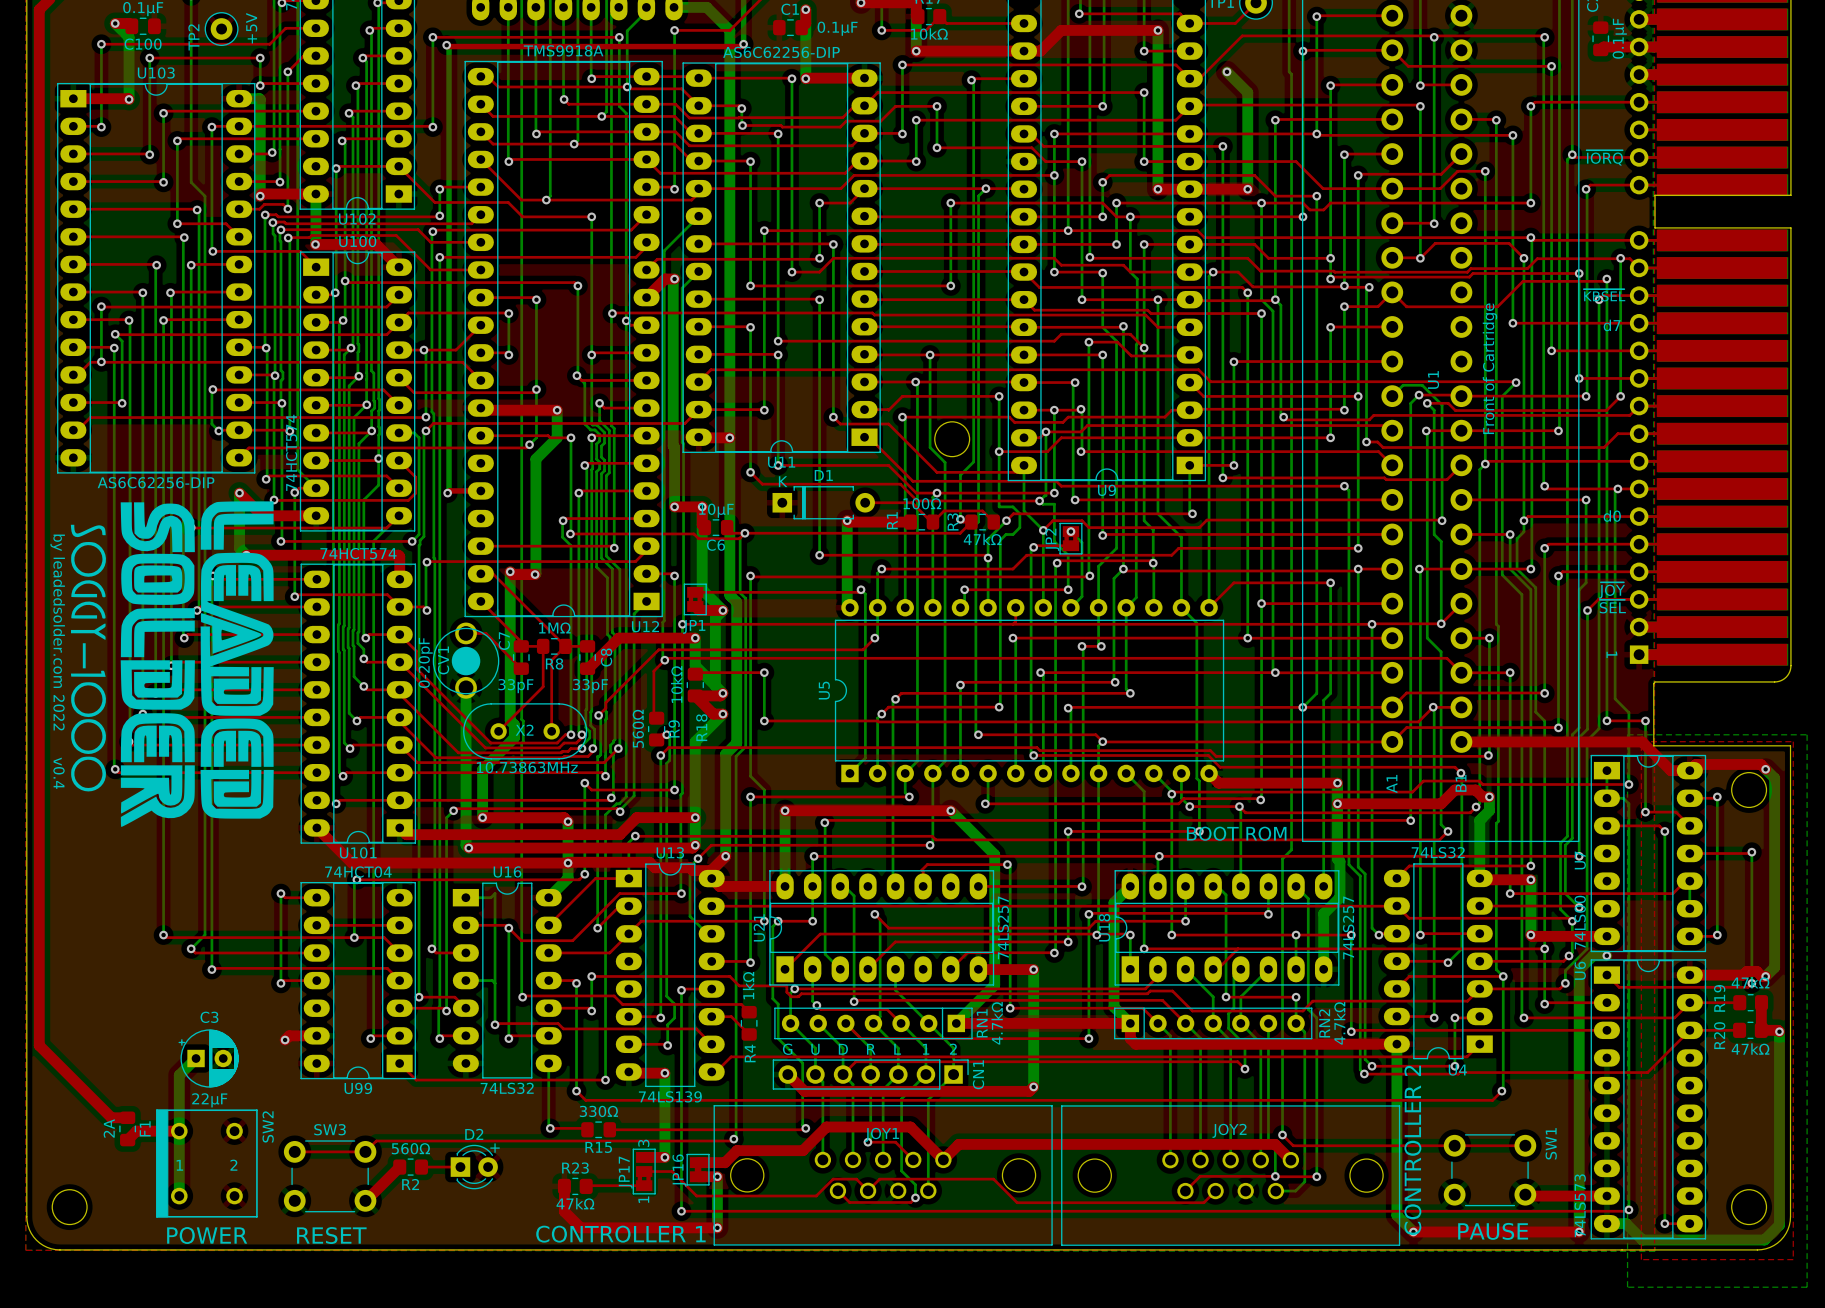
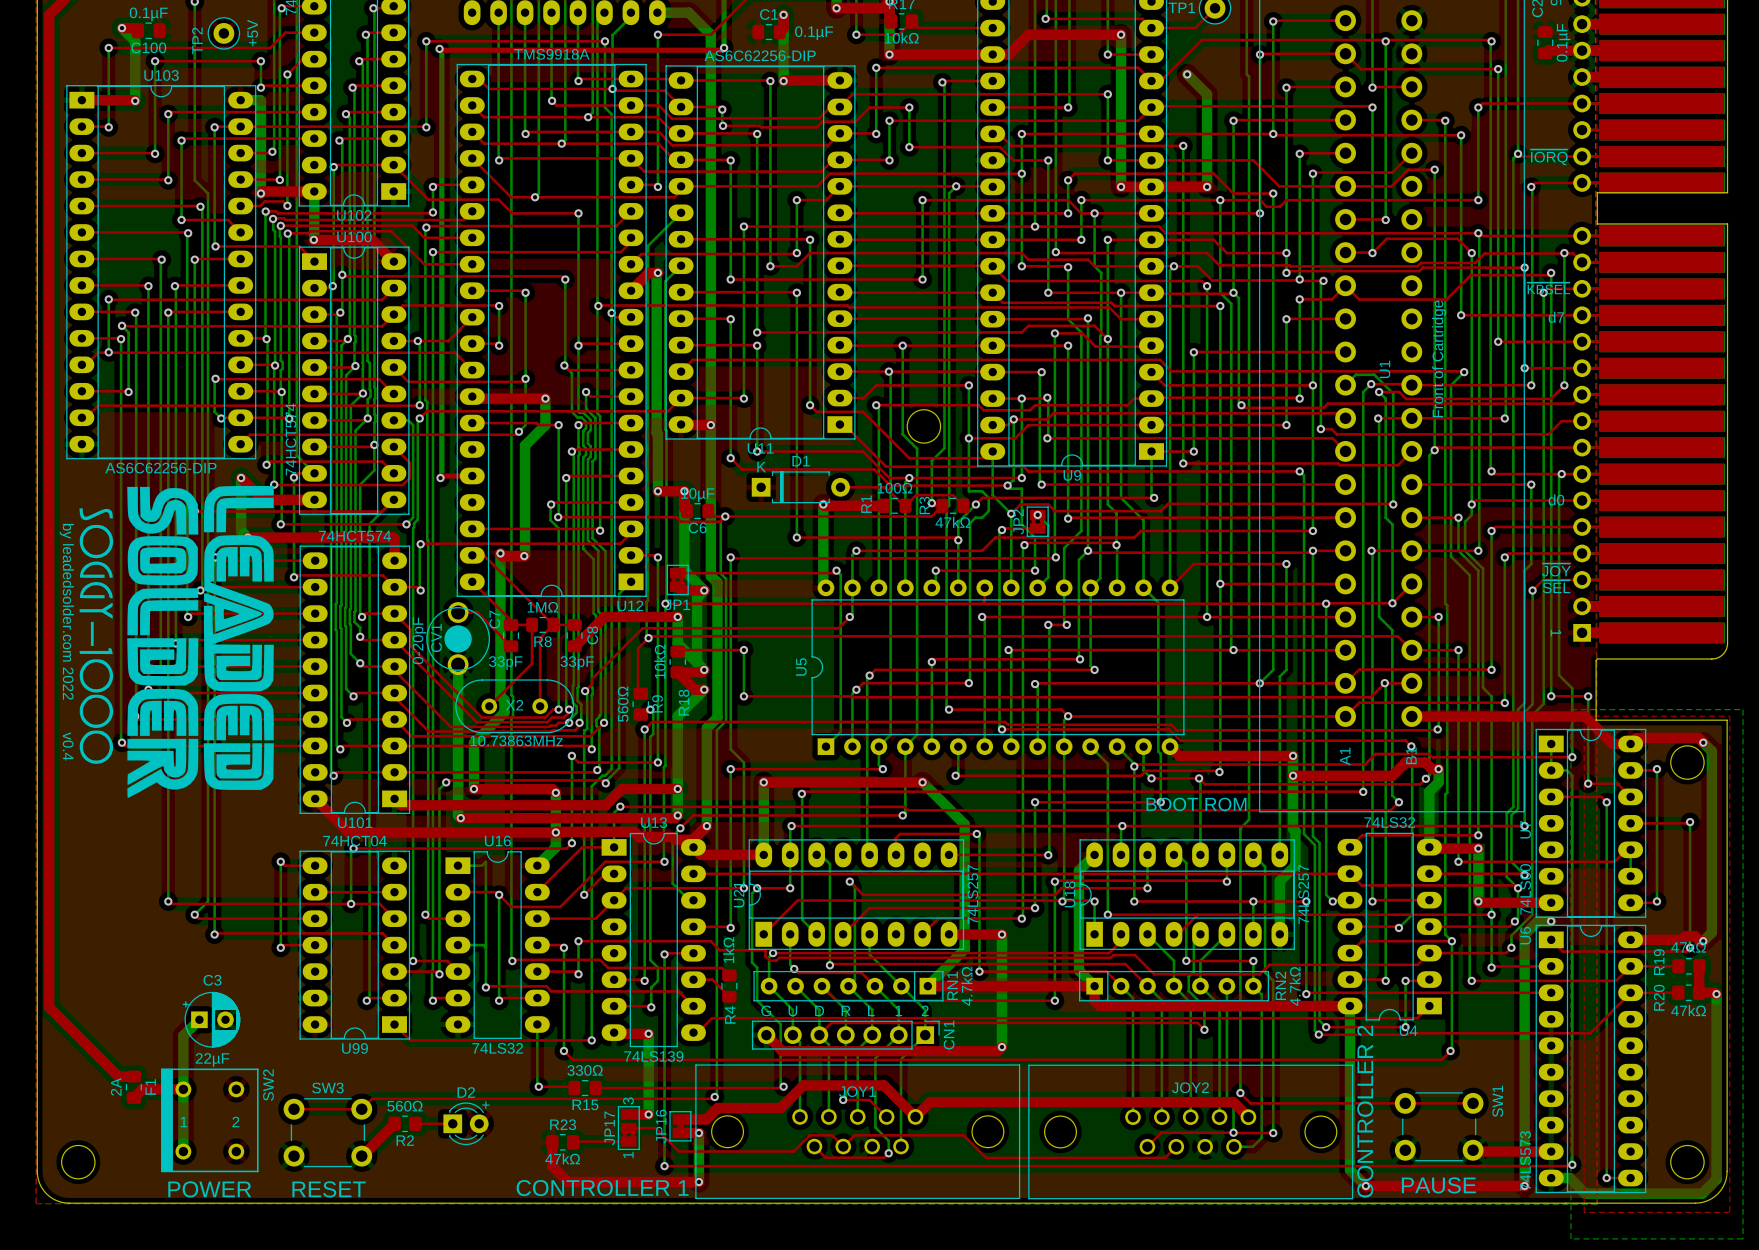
top track: (316, 1035) (289, 1035) (285, 1040) -> none
via: (285, 1040) -> none

